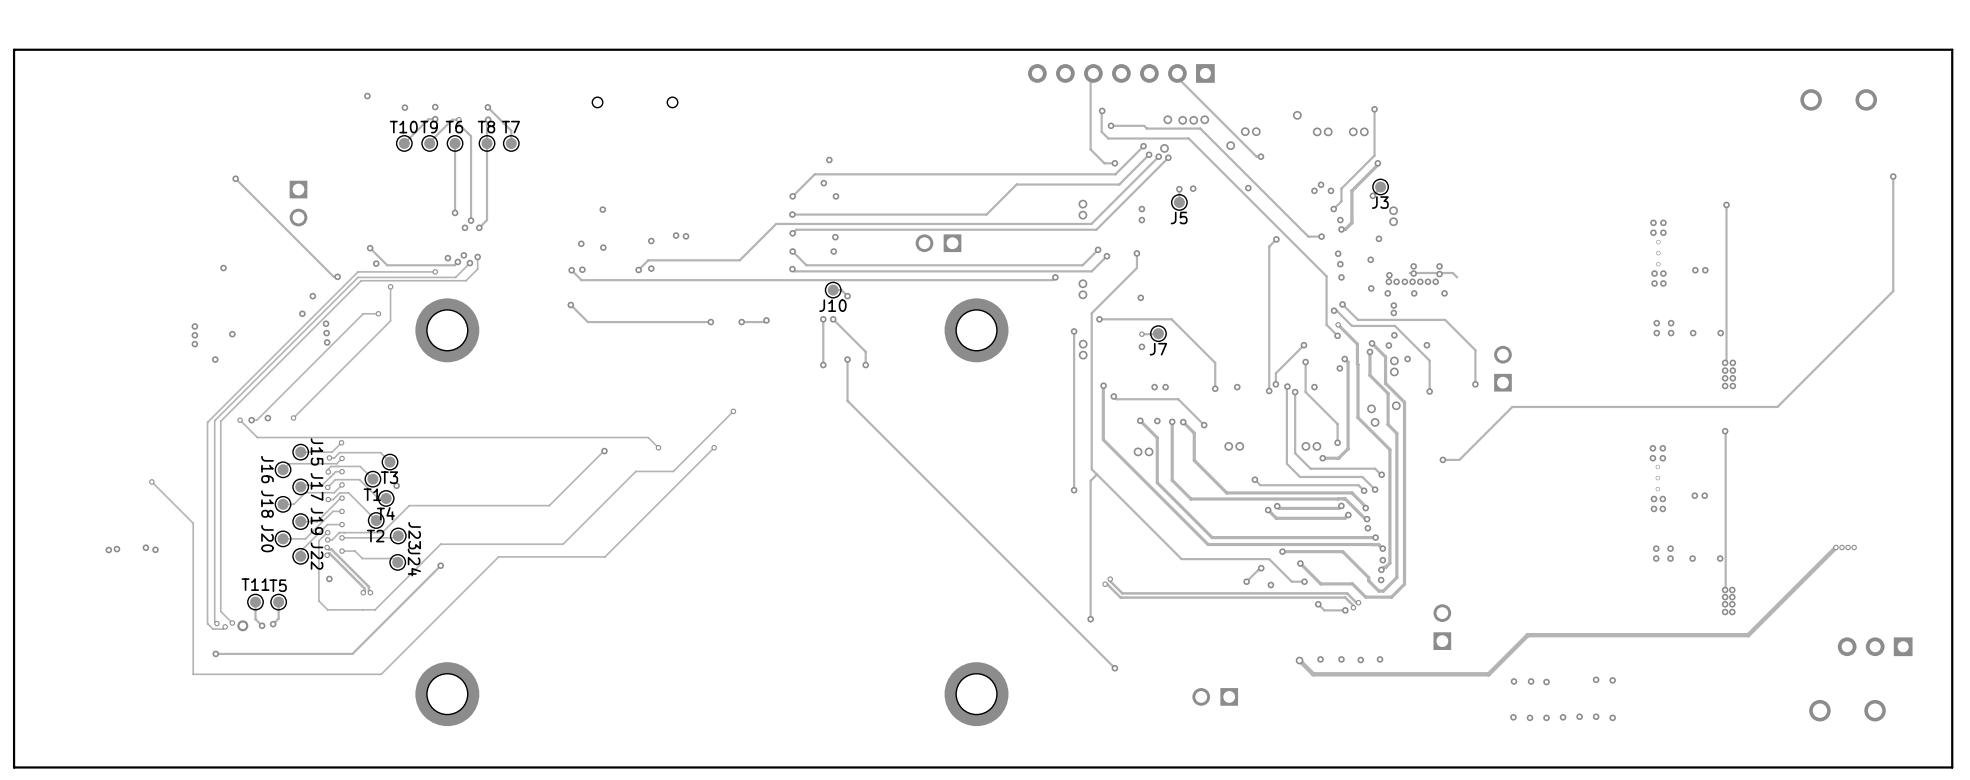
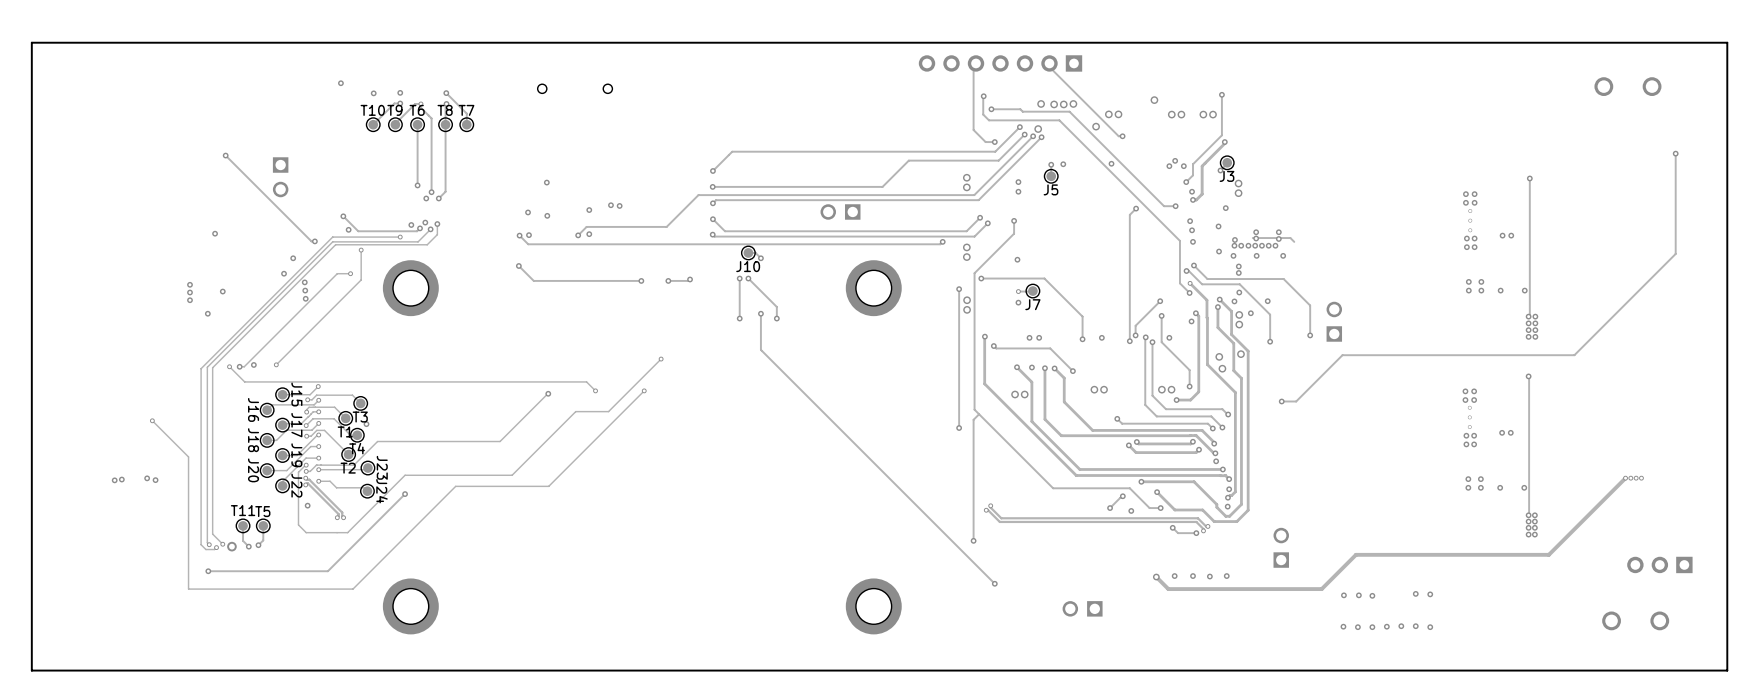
via: (829, 160) -> none
via: (823, 183) -> none
via: (835, 196) -> none
via: (835, 237) -> none
via: (833, 251) -> none

